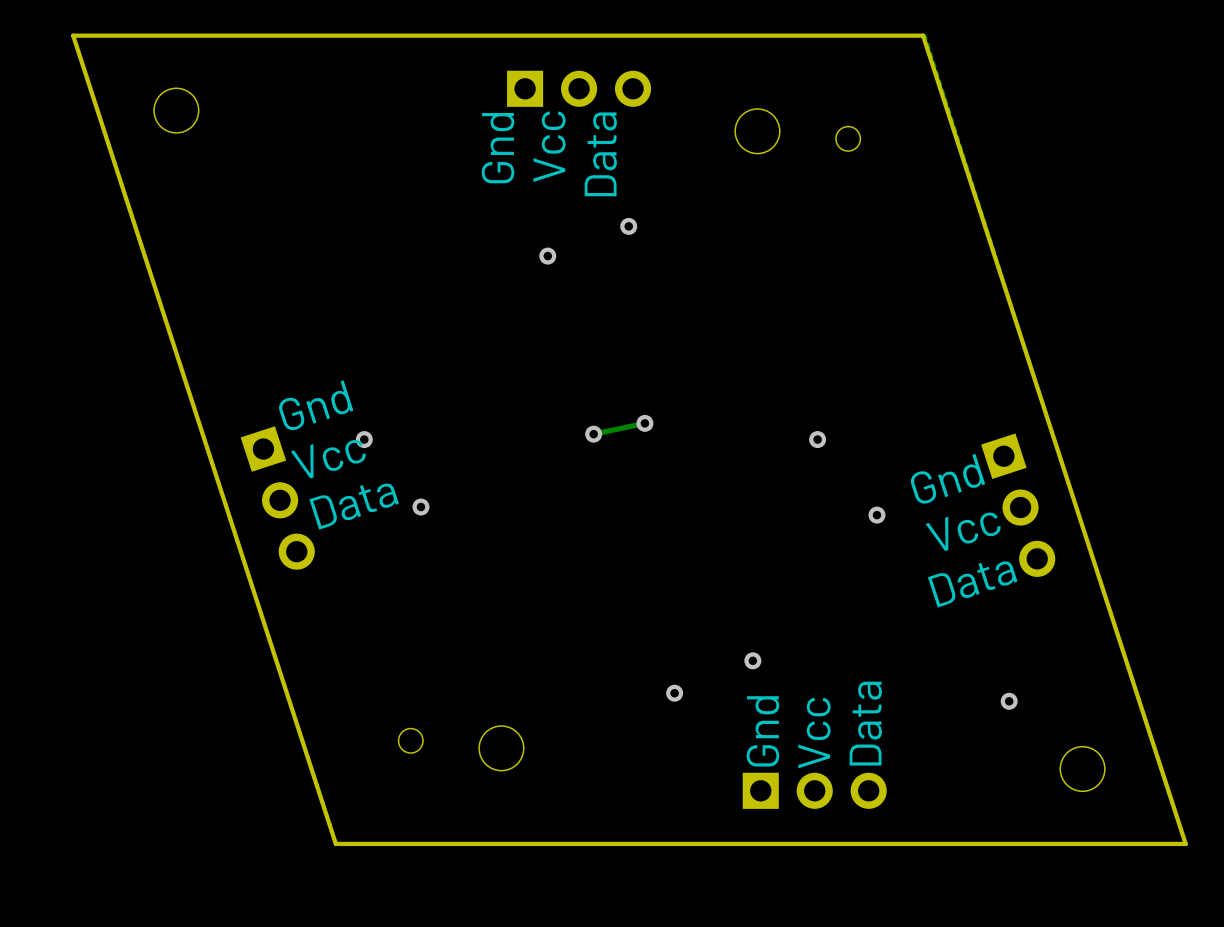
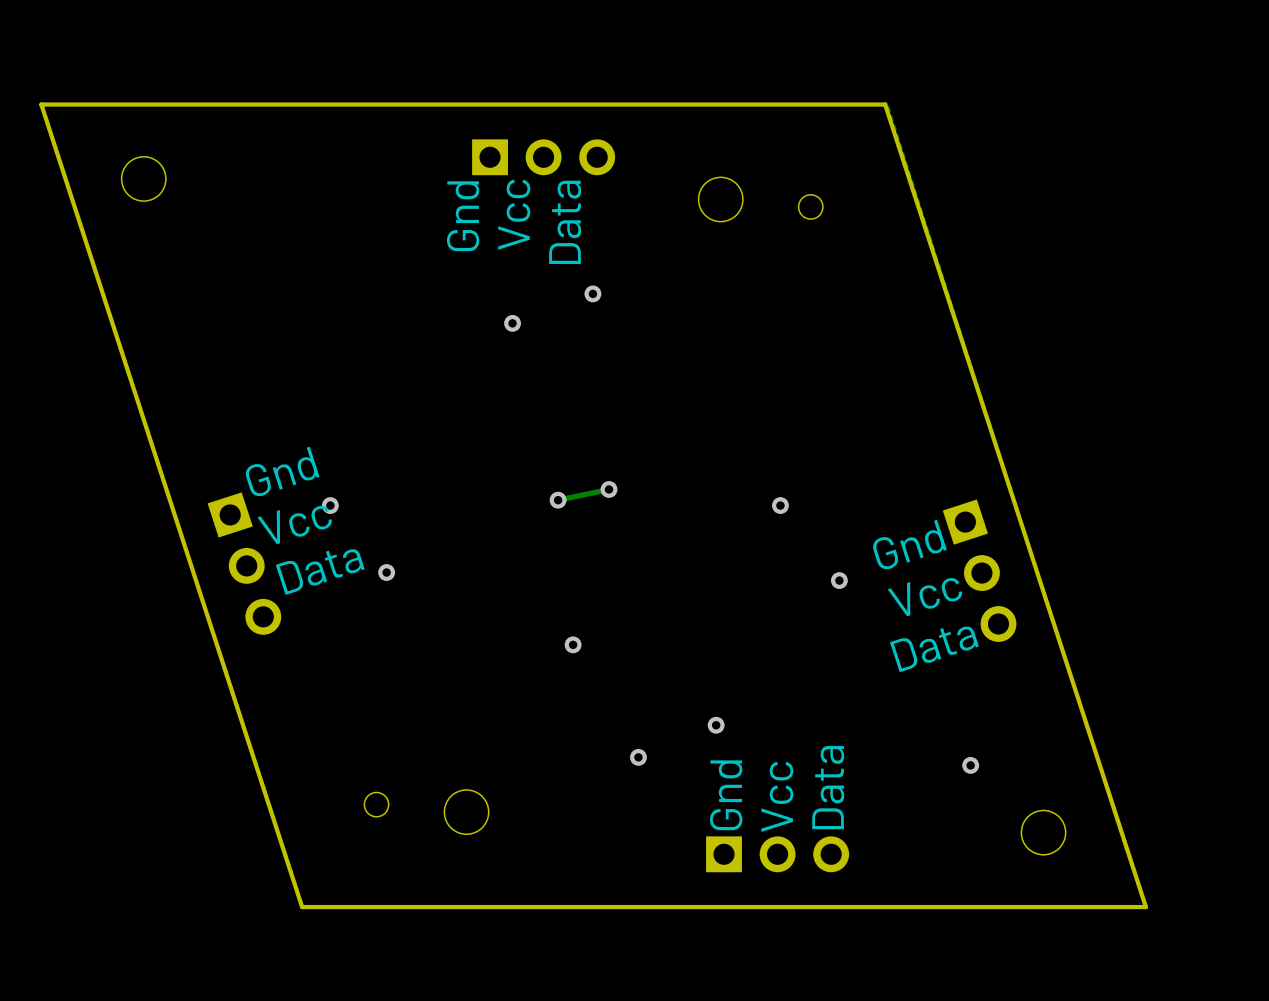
via: none -> (573, 644)

